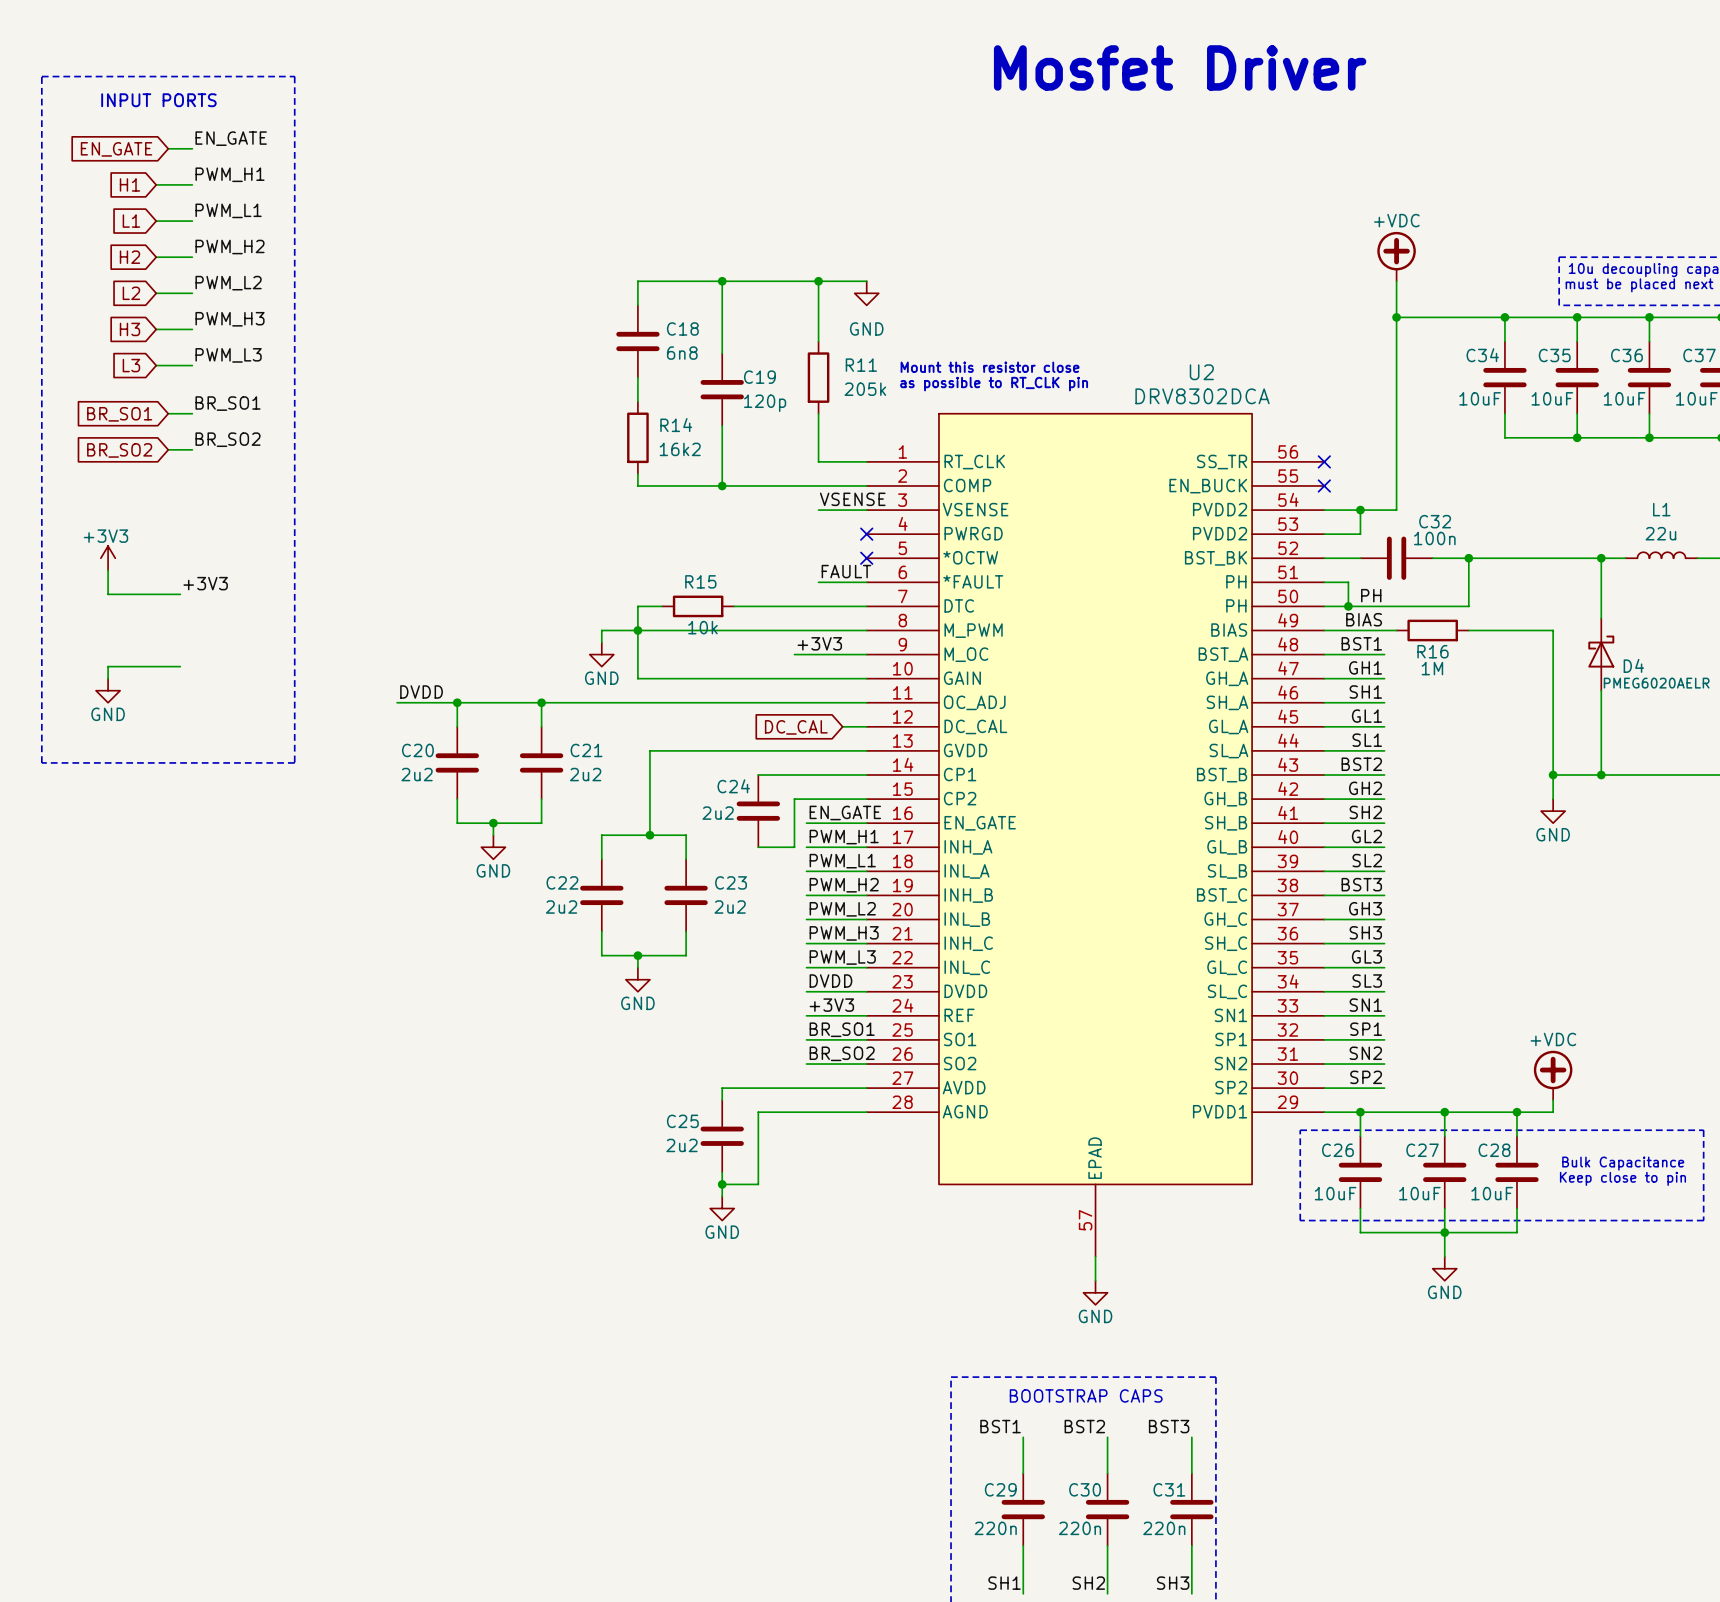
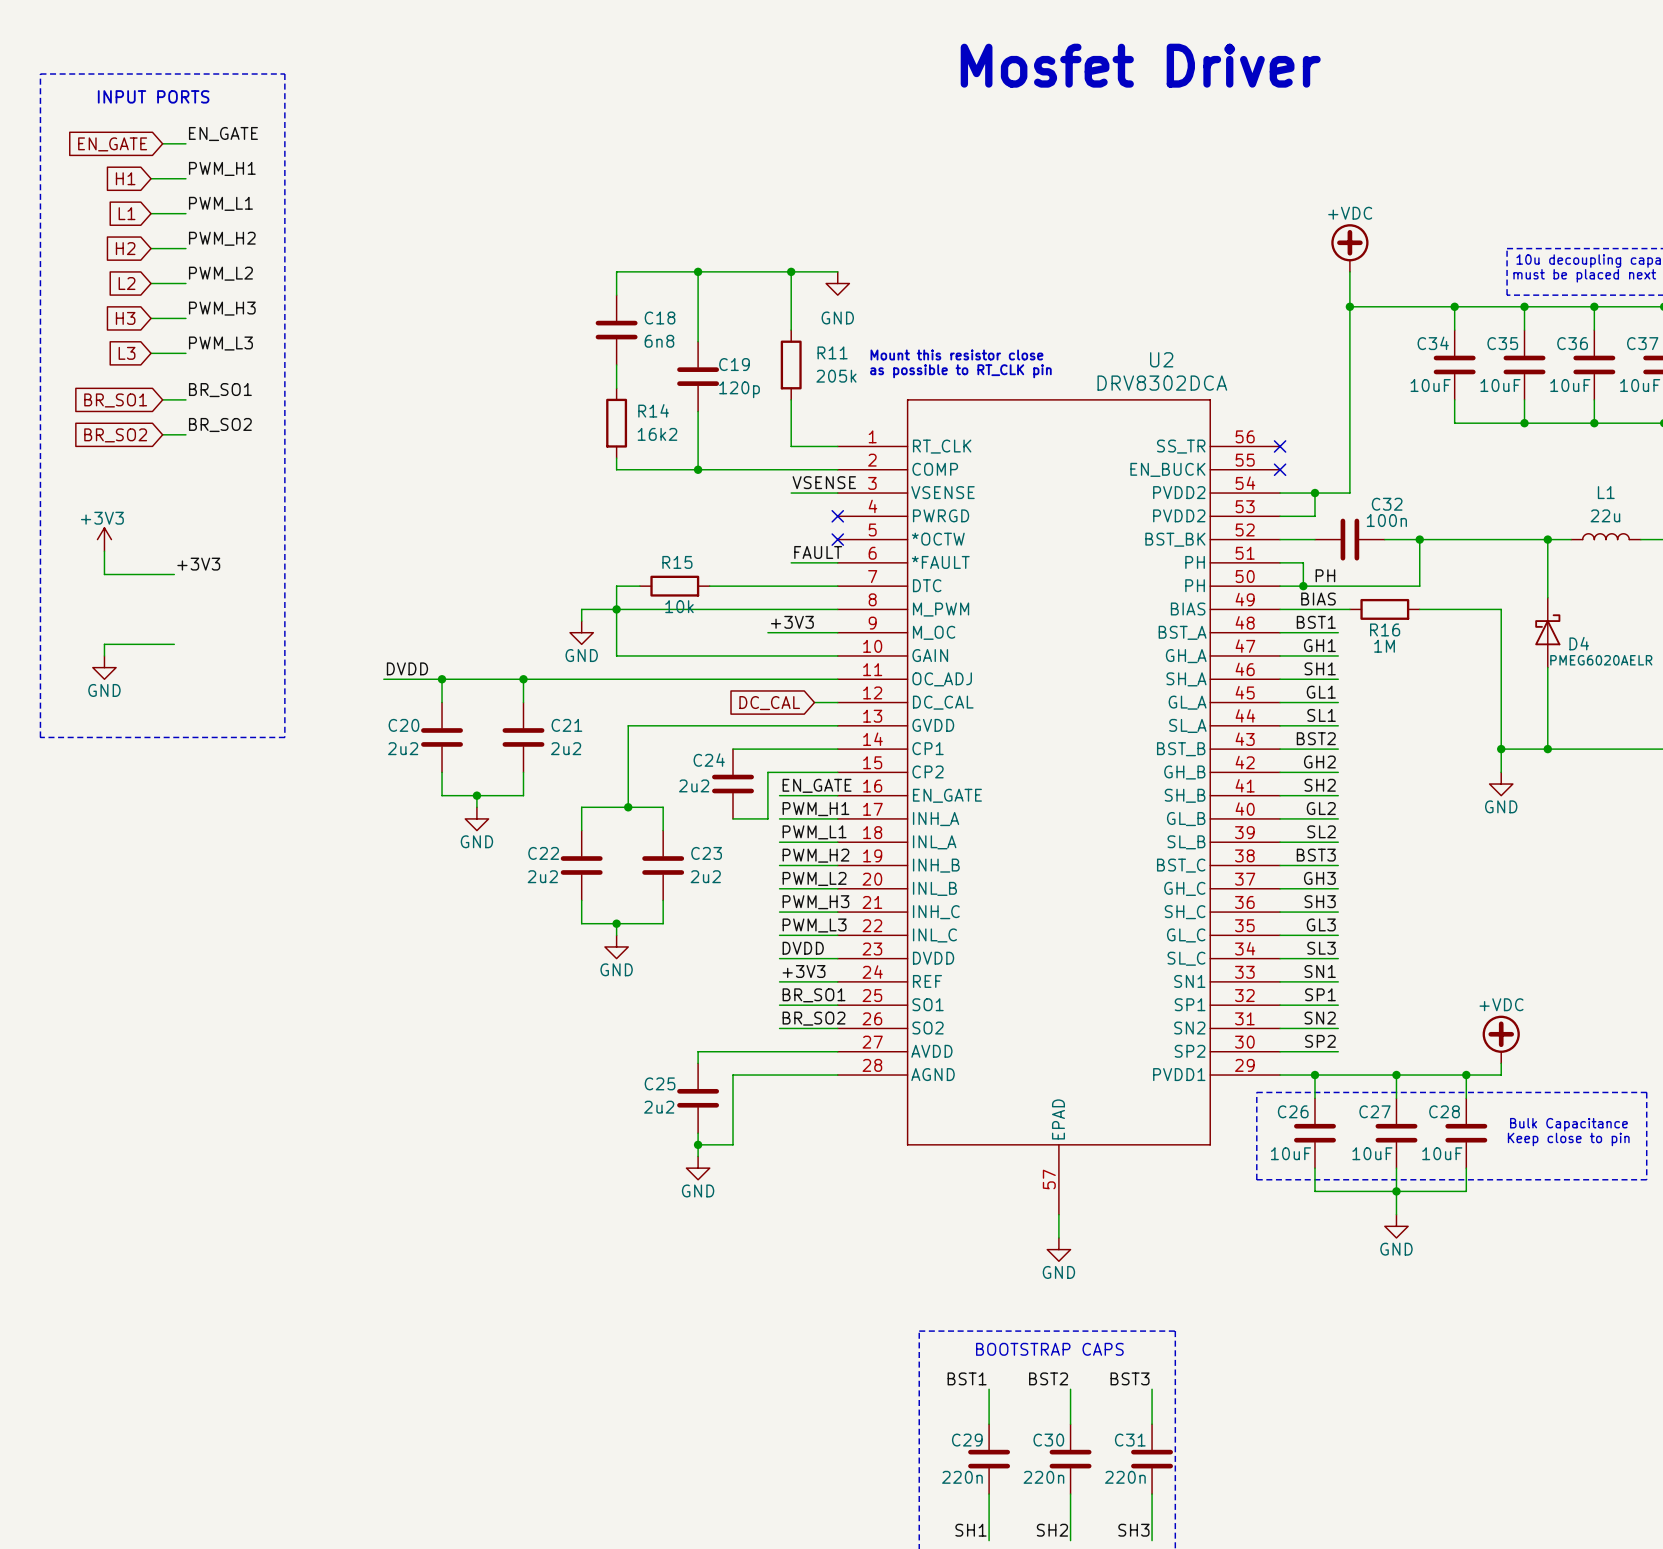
U2 symbol: [866, 413, 1325, 1257] -> [837, 399, 1281, 1215]

